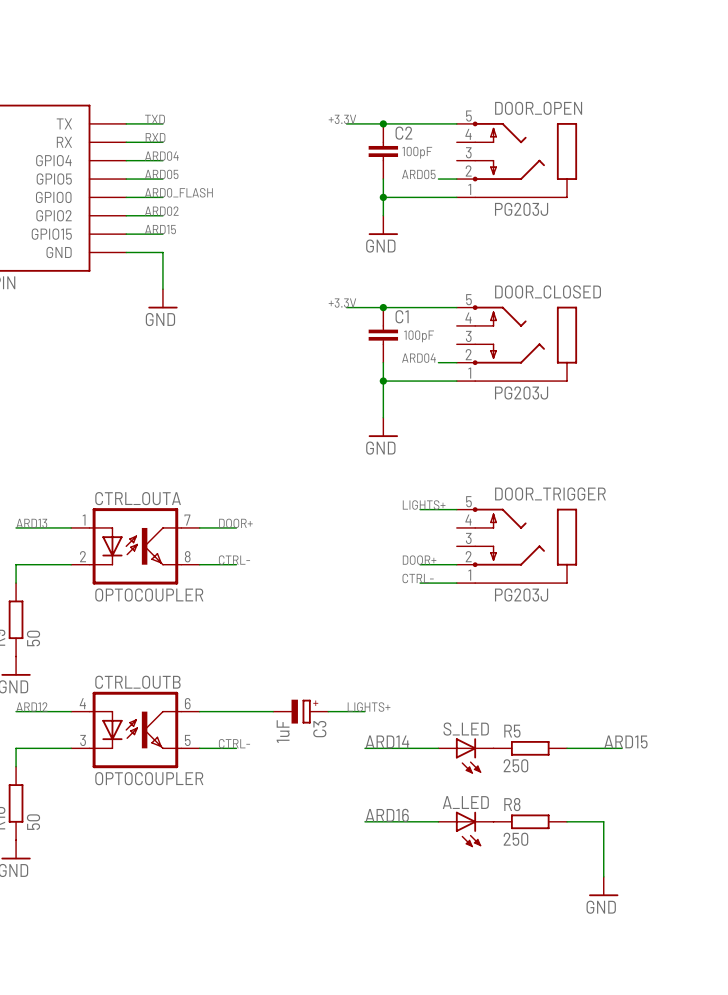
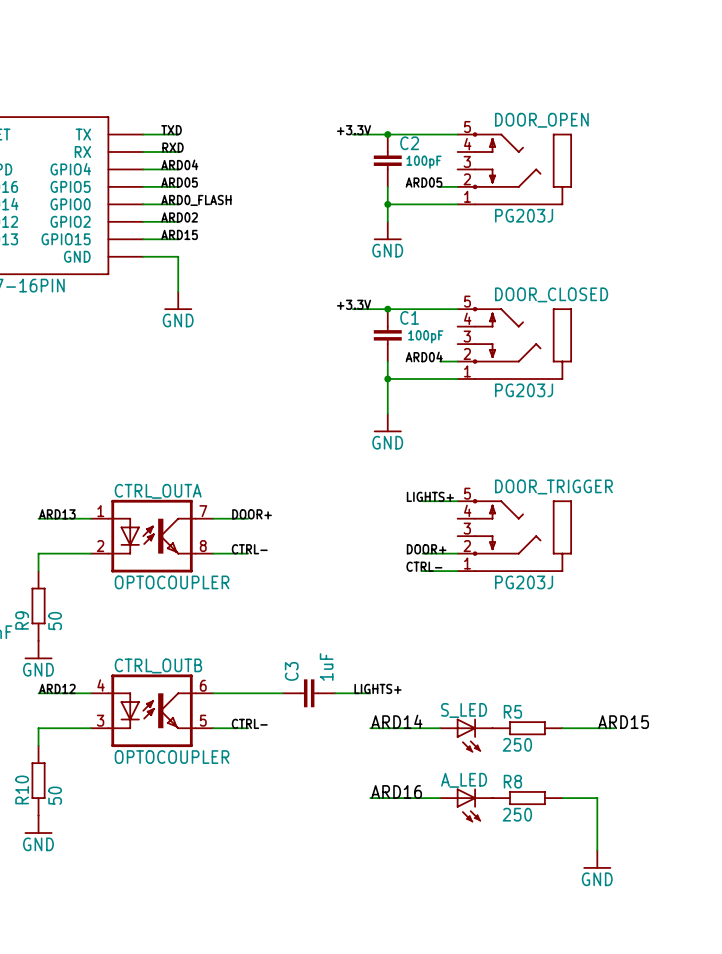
C3 symbol: [273, 699, 329, 724] -> [283, 679, 336, 708]
C3 name position: C3 (319, 729) -> C3 (291, 671)
C3 value position: 1uF (283, 731) -> 1uF (326, 667)

